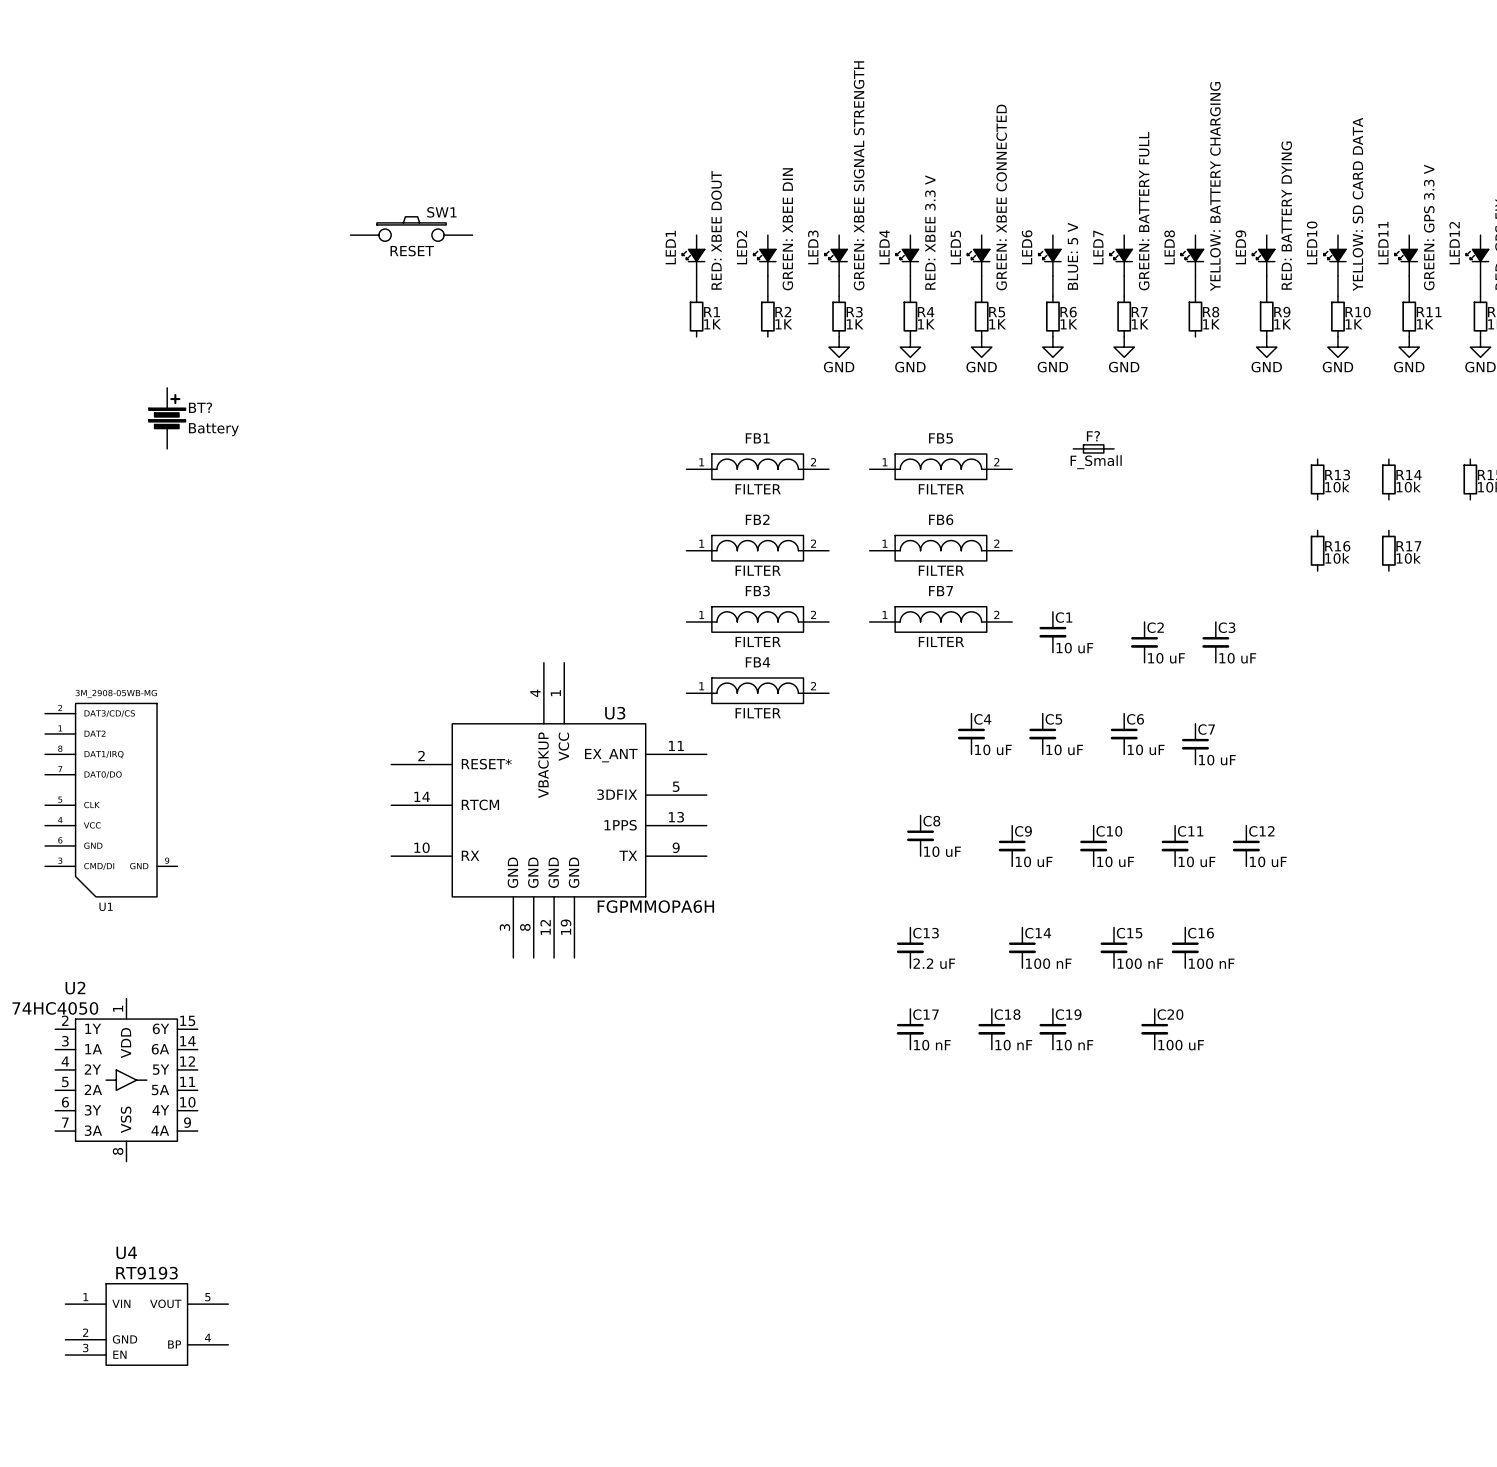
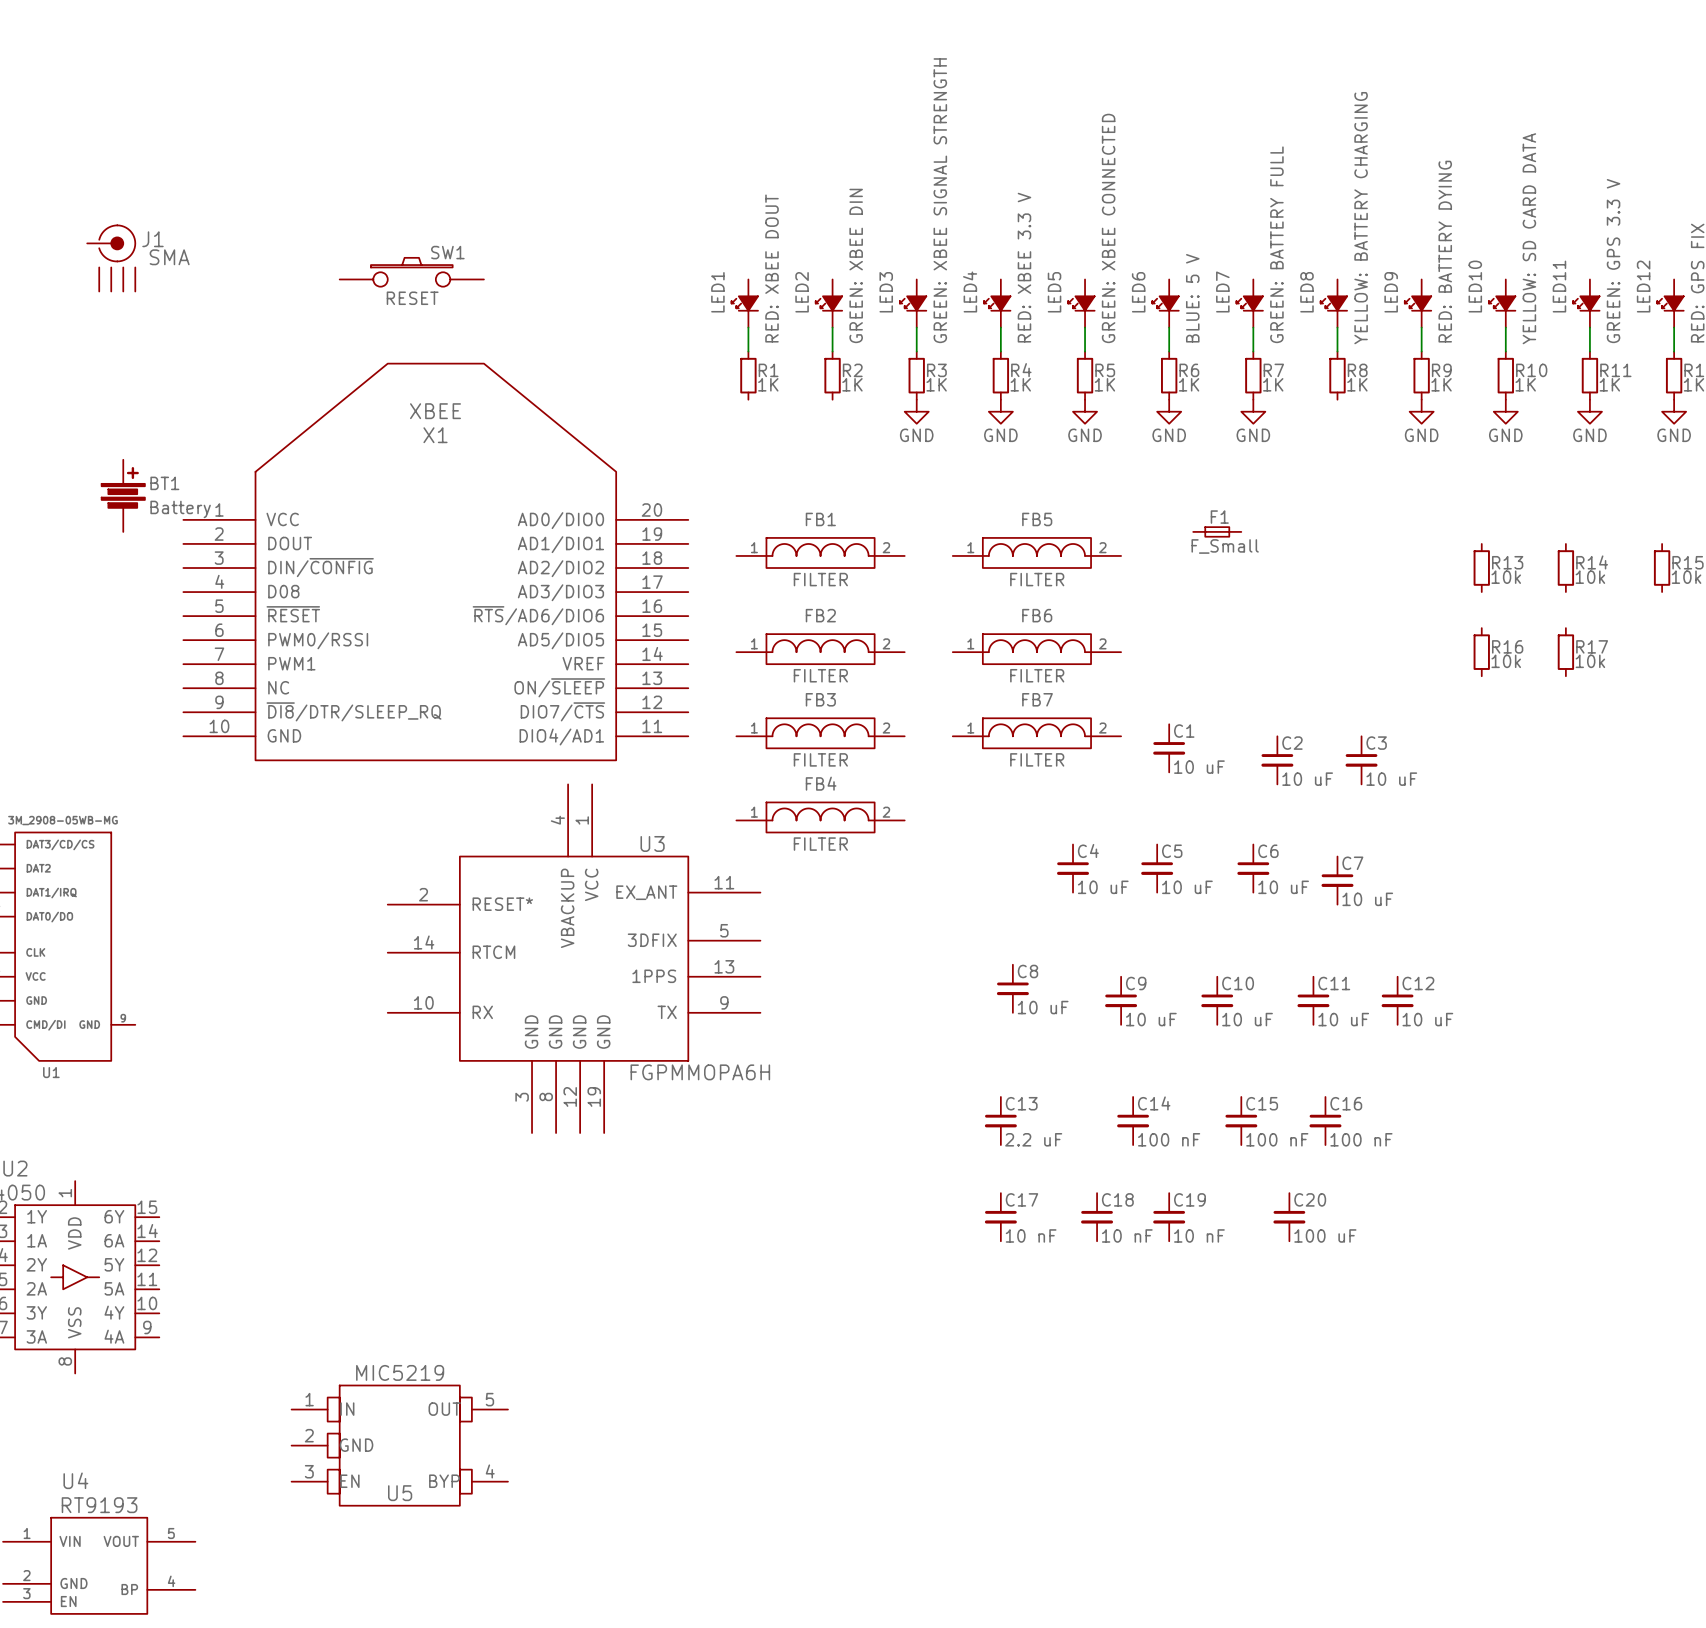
J1: none -> SMA (111, 258)
BT? name: BT? (200, 407) -> BT1 (164, 483)
F? name: F? (1093, 436) -> F1 (1219, 517)
X1: none -> XBEE (435, 561)
U5: none -> MIC5219 (399, 1445)

